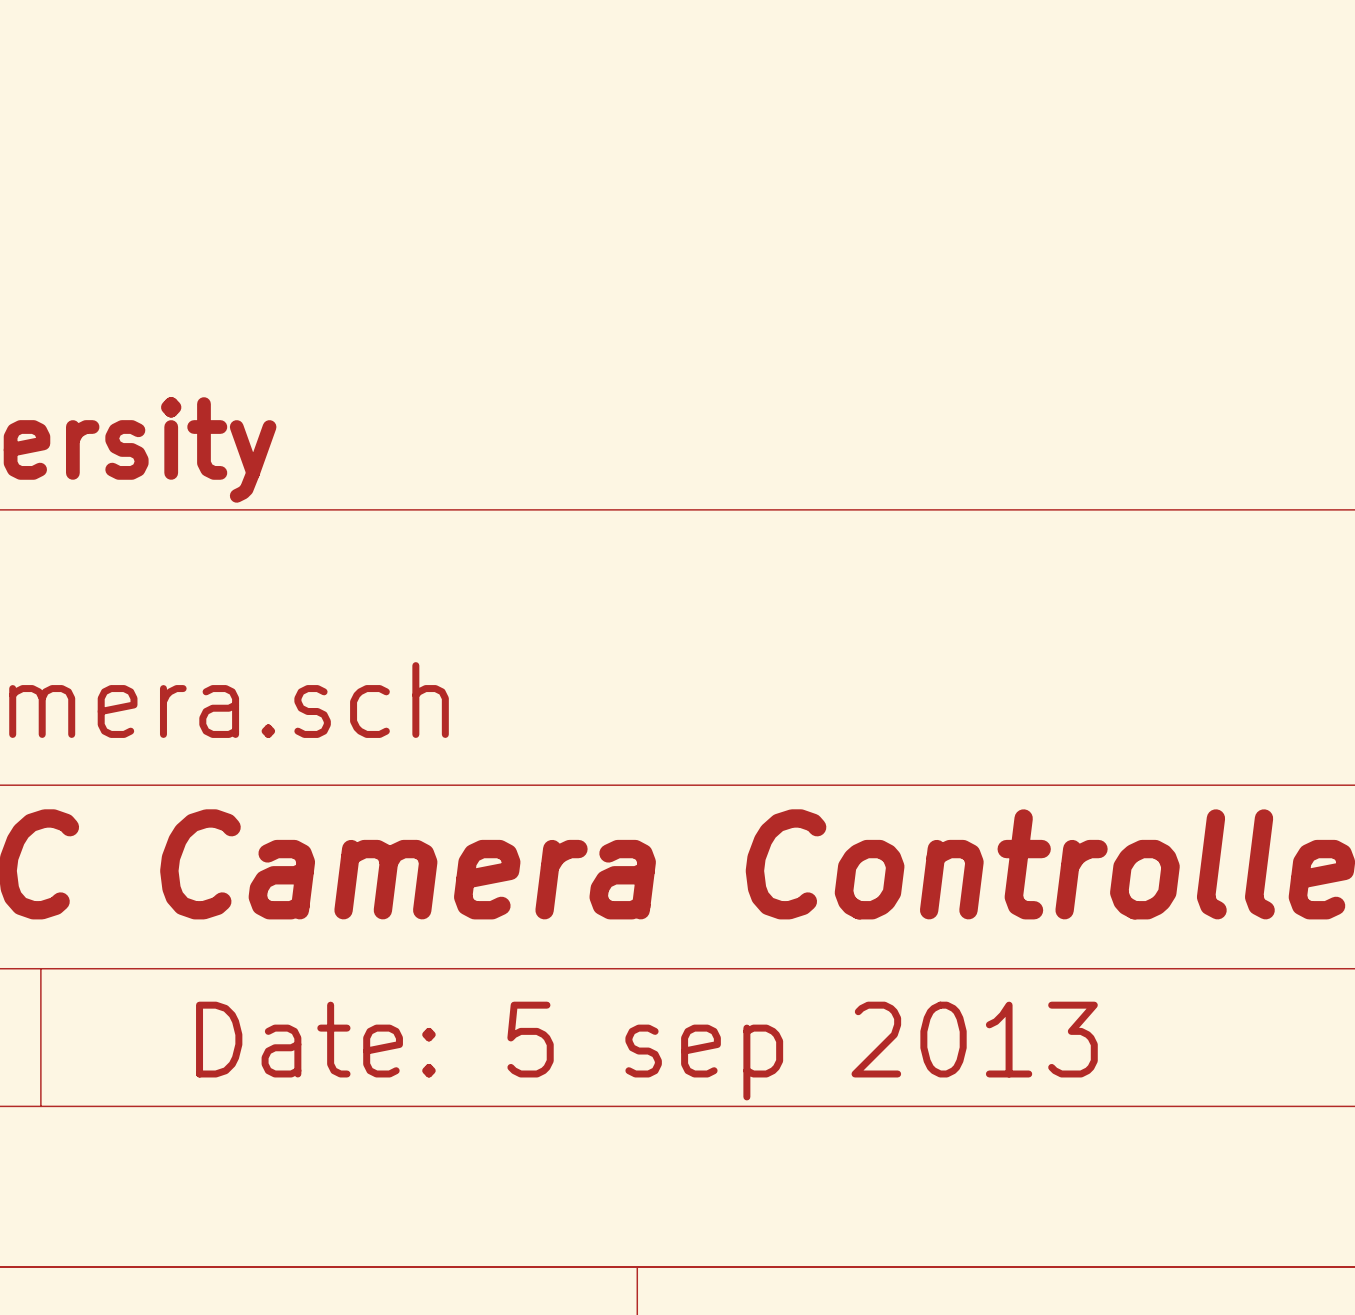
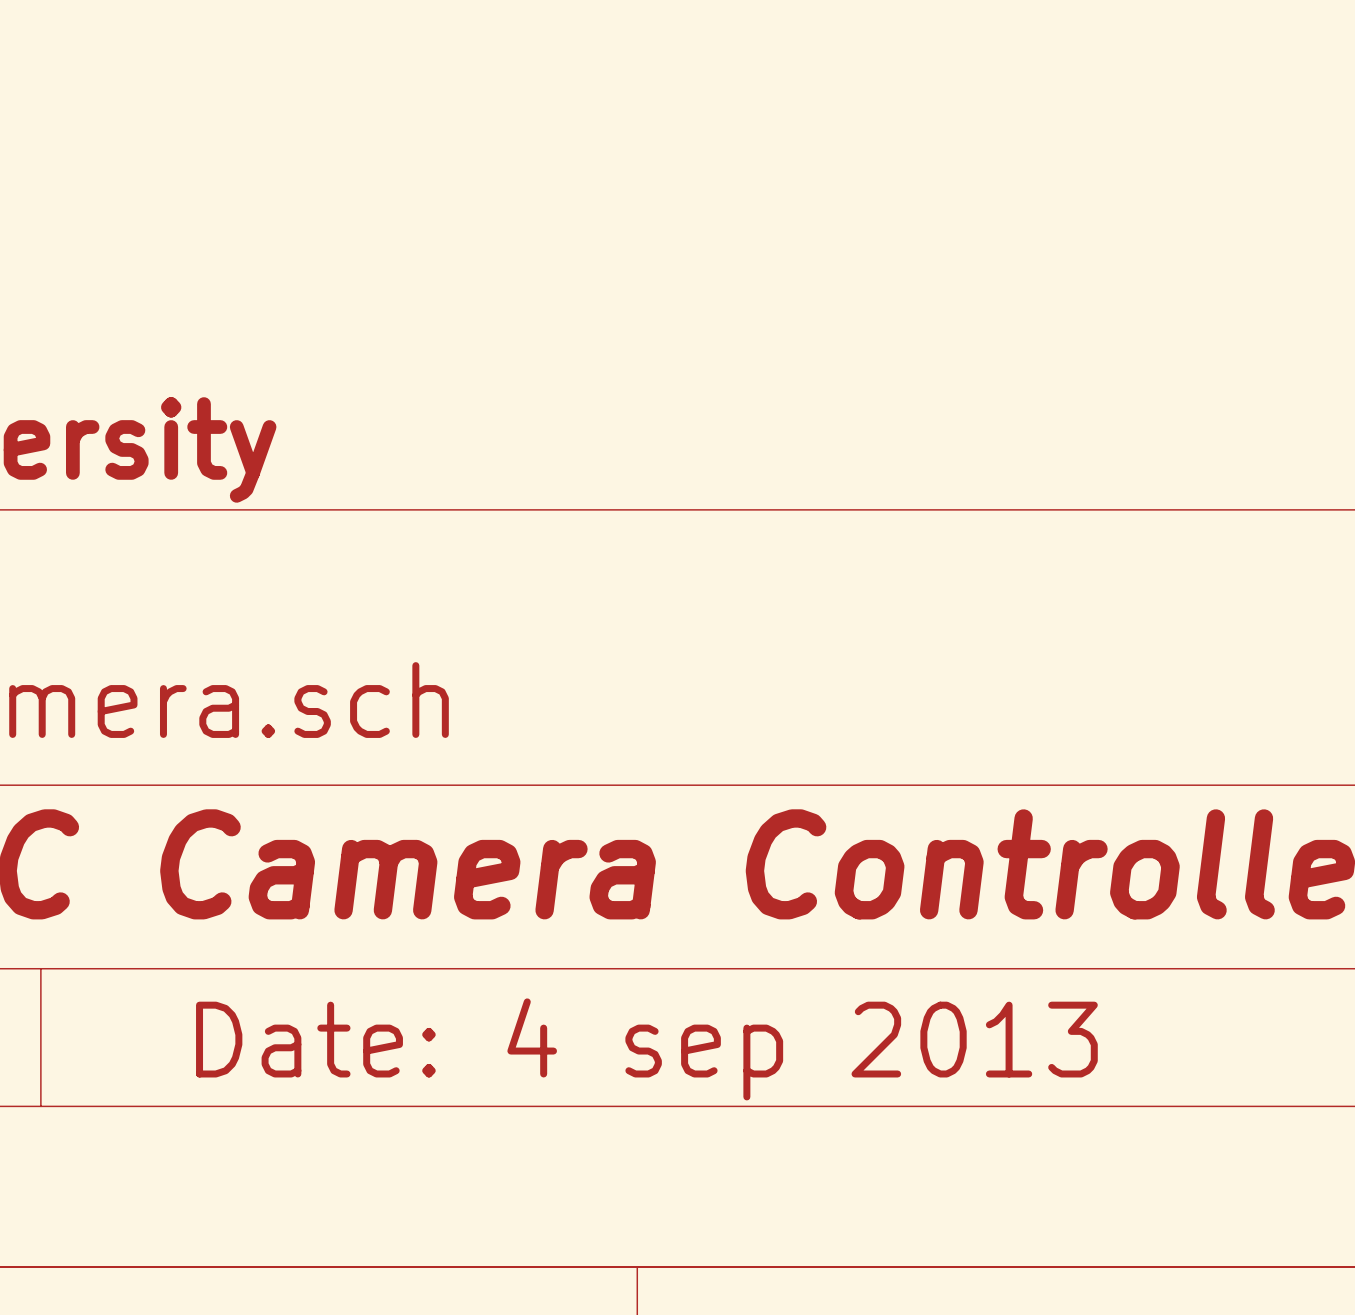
title block: Date: 5 sep 2013 (646, 1051) -> Date: 4 sep 2013 (646, 1049)

